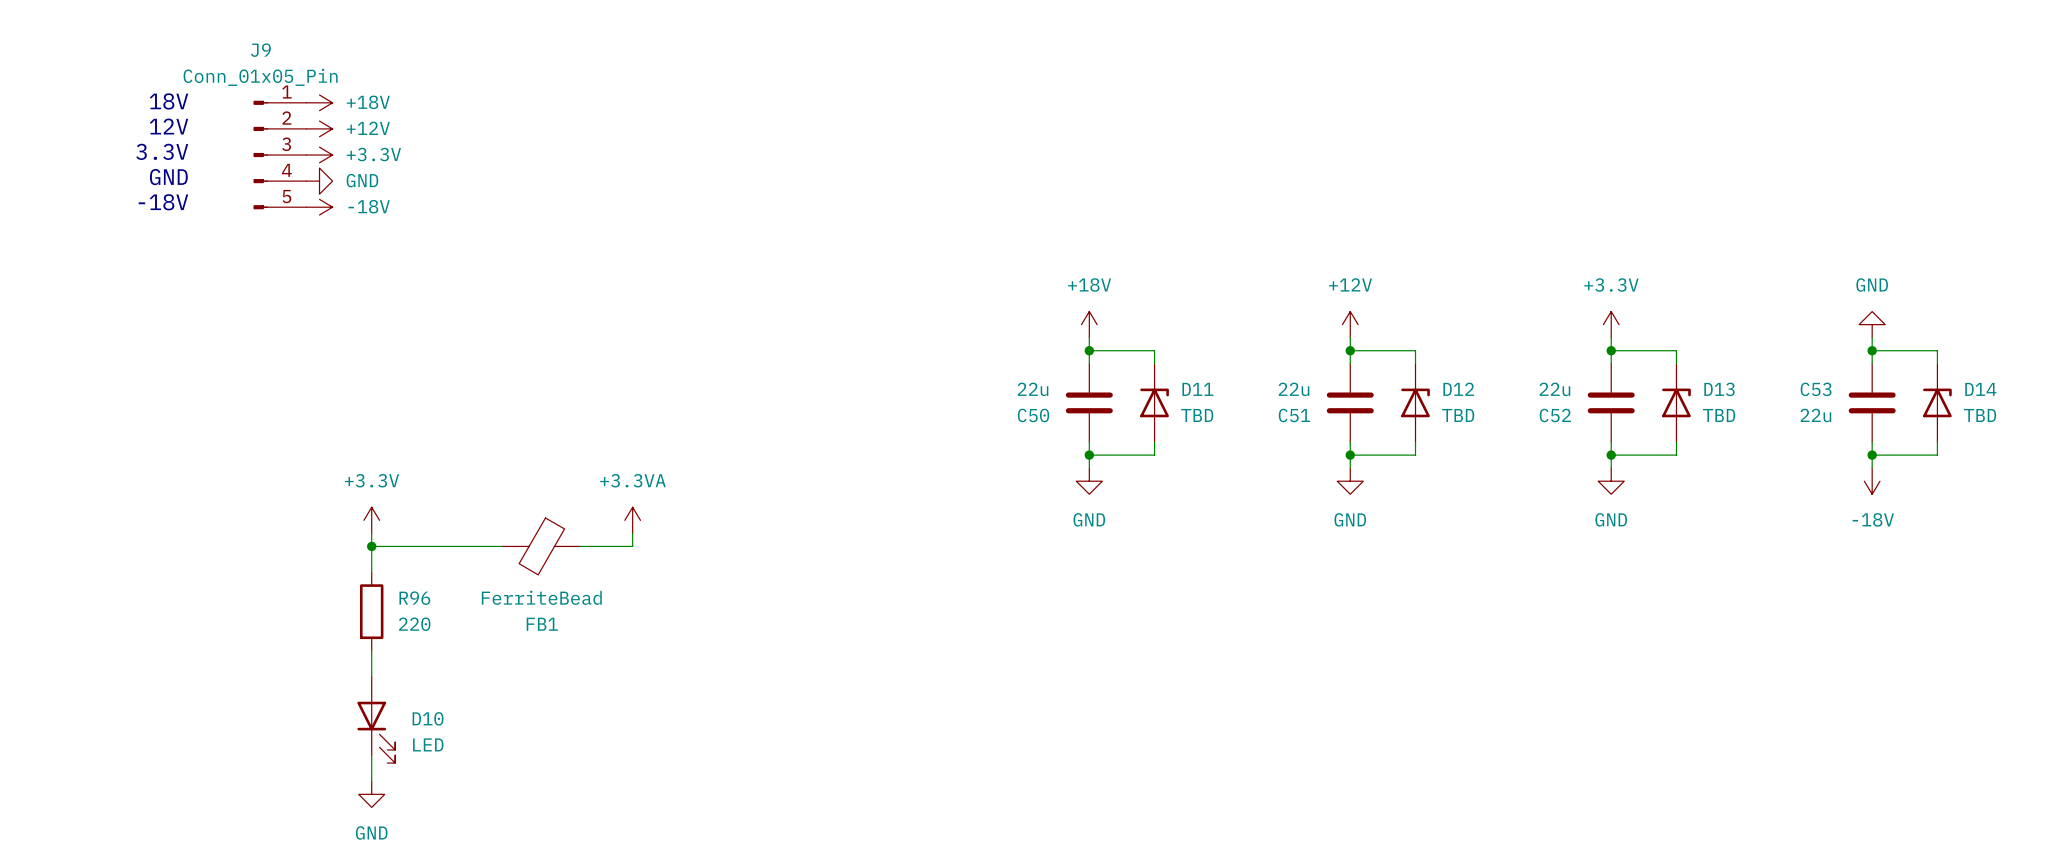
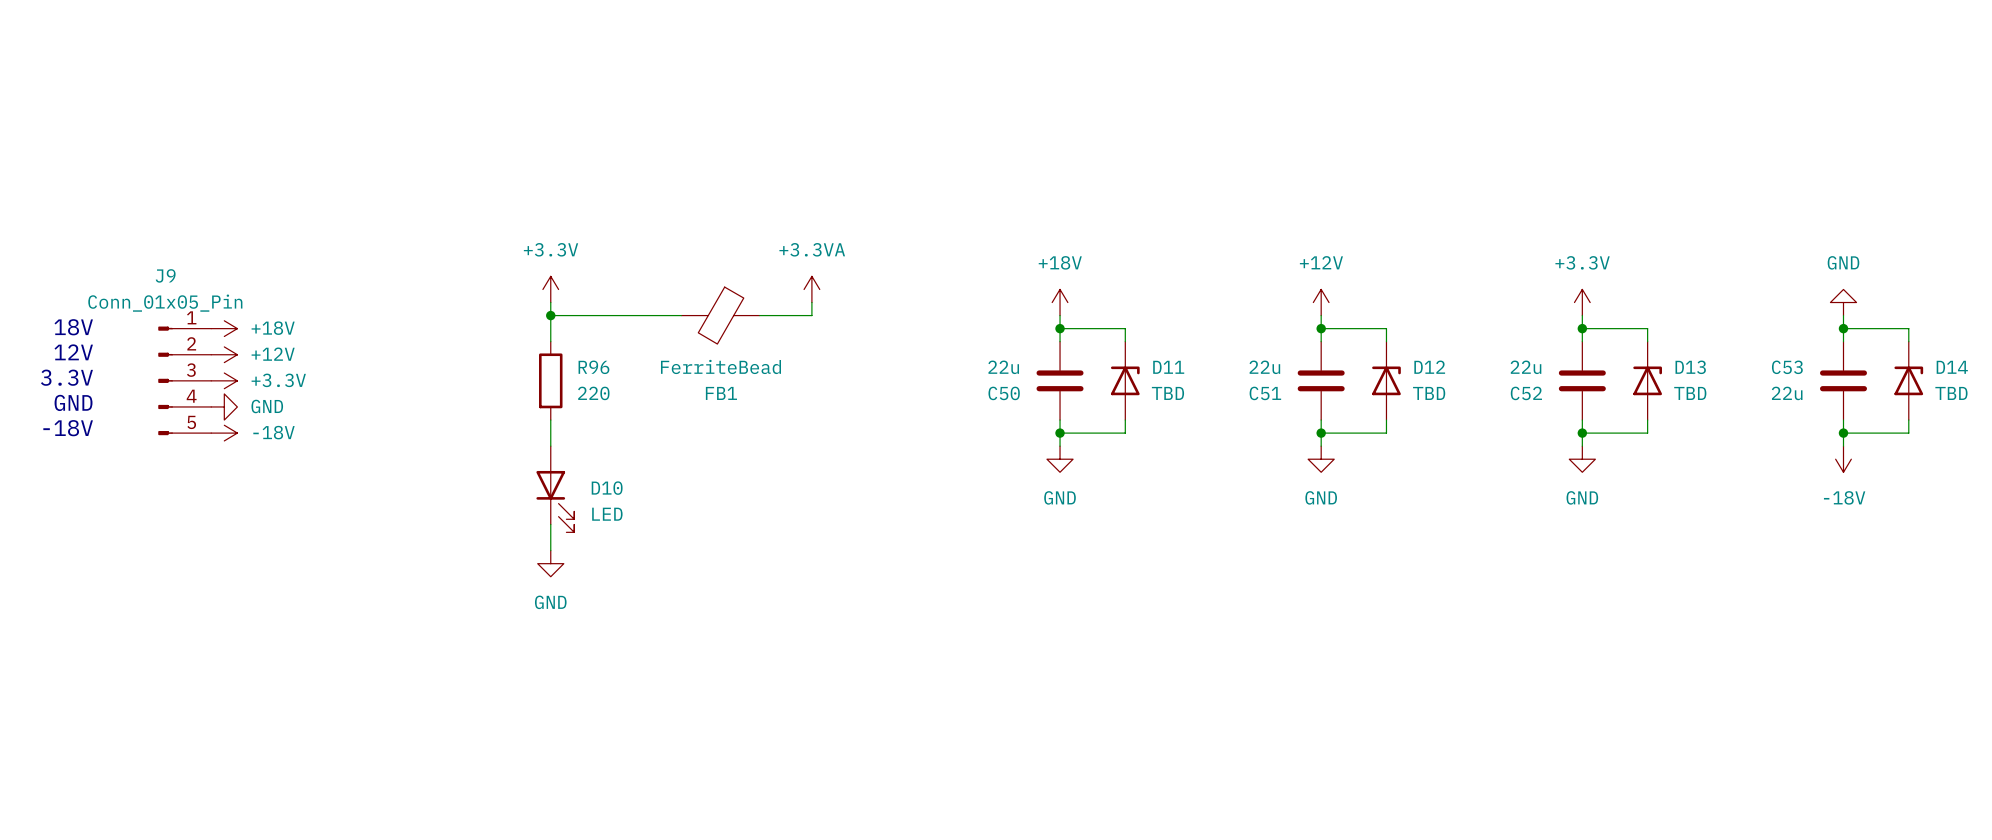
text position: 18V (169, 101) -> 18V (73, 327)
power symbol position: +18V (319, 102) -> +18V (224, 328)
text position: 12V (169, 126) -> 12V (73, 352)
power symbol position: +12V (319, 128) -> +12V (224, 354)
text position: 3.3V (162, 151) -> 3.3V (66, 377)
J9 position: (279, 155) -> (184, 380)
power symbol: +3.3V (319, 155) -> none
text position: GND (168, 177) -> GND (73, 402)
power symbol: GND (319, 181) -> none
text position: -18V (163, 202) -> -18V (68, 428)
power symbol position: -18V (319, 207) -> -18V (224, 433)
power symbol: none -> +3.3V (550, 289)
power symbol: none -> +3.3VA (811, 289)
wire: none -> (550, 302) (550, 341)
wire: none -> (811, 302) (811, 315) (759, 315)
wire: none -> (550, 315) (681, 315)
junction: none -> (550, 315)
power symbol: none -> +3.3V (224, 380)
power symbol: none -> GND (224, 406)
wire: none -> (550, 420) (550, 446)
power symbol: +3.3V (371, 520) -> none
power symbol: +3.3VA (632, 520) -> none
wire: (371, 533) (371, 572) -> none
wire: (632, 533) (632, 546) (580, 546) -> (550, 550) (550, 524)
wire: (371, 546) (502, 546) -> none
junction: (371, 546) -> none
FB1 position: (541, 546) -> (720, 315)
power symbol: none -> GND (550, 563)
R96 position: (371, 611) -> (550, 380)
wire: (371, 650) (371, 676) -> none
D10 position: (376, 719) -> (555, 489)
wire: (371, 755) (371, 781) -> none
power symbol: GND (371, 794) -> none

